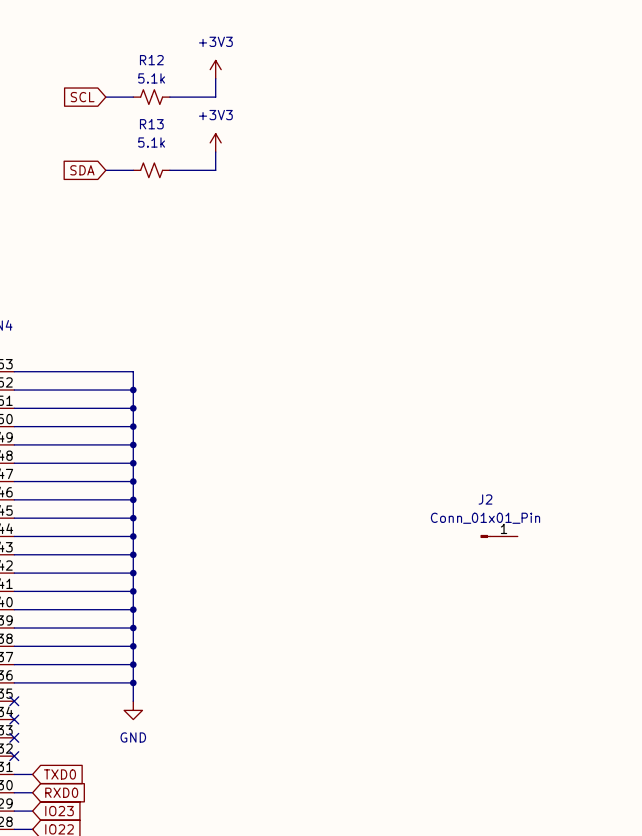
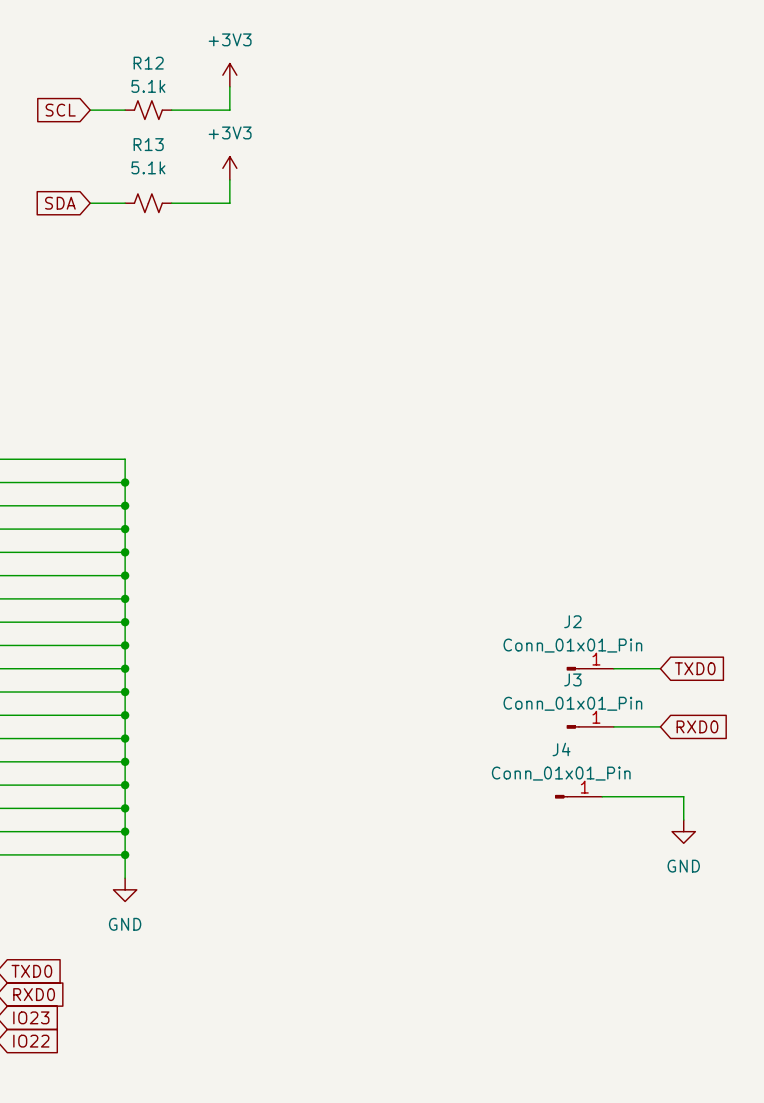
wire: none -> (613, 668) (660, 668)
global label: none -> TXD0 (695, 668)
J3: none -> Conn_01x01_Pin (590, 726)
wire: none -> (613, 726) (660, 726)
global label: none -> RXD0 (697, 726)
J4: none -> Conn_01x01_Pin (578, 796)
wire: none -> (602, 796) (683, 796) (683, 820)
power symbol: none -> GND (683, 831)

